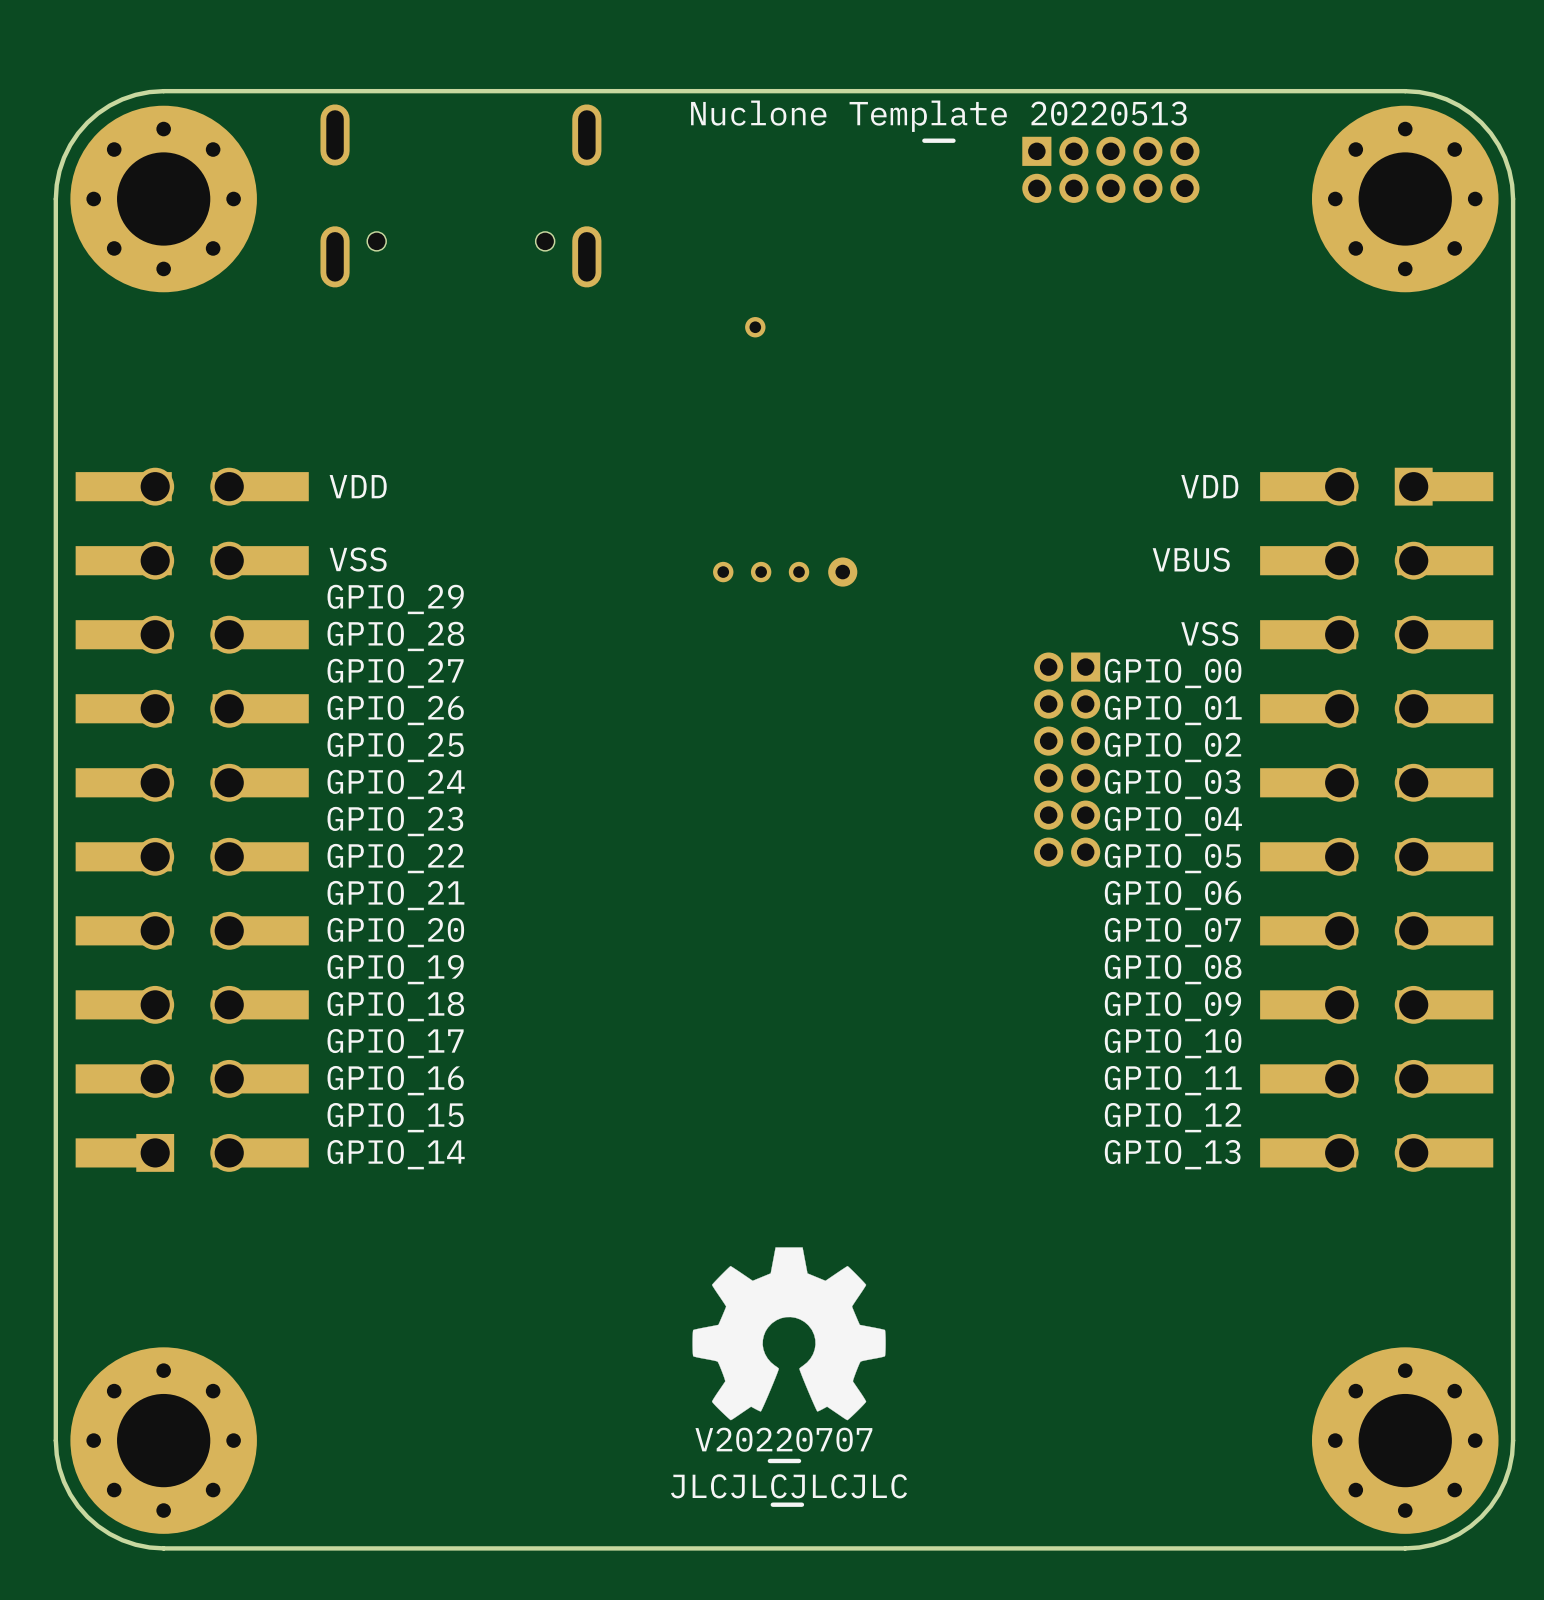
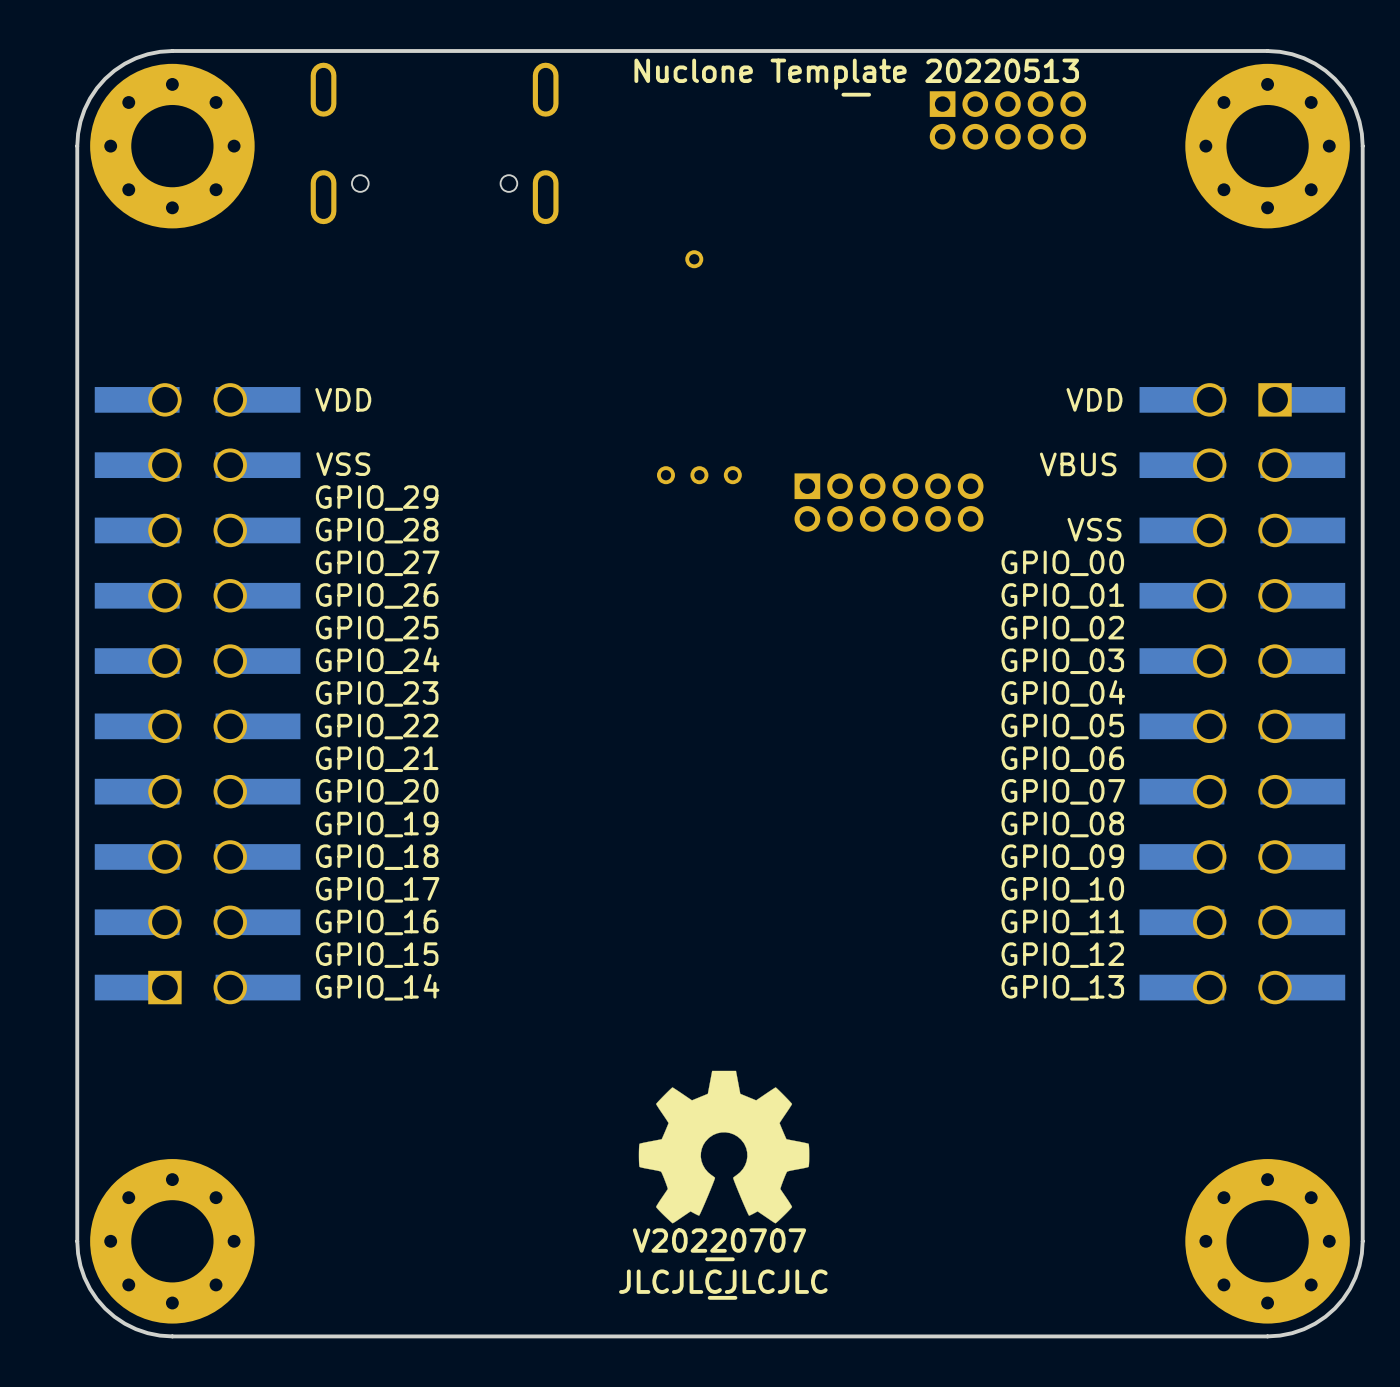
part: (842, 572) -> none
part rotation: 0° (1067, 759) -> 90° counterclockwise (889, 502)
part position: (1067, 759) -> (889, 502)

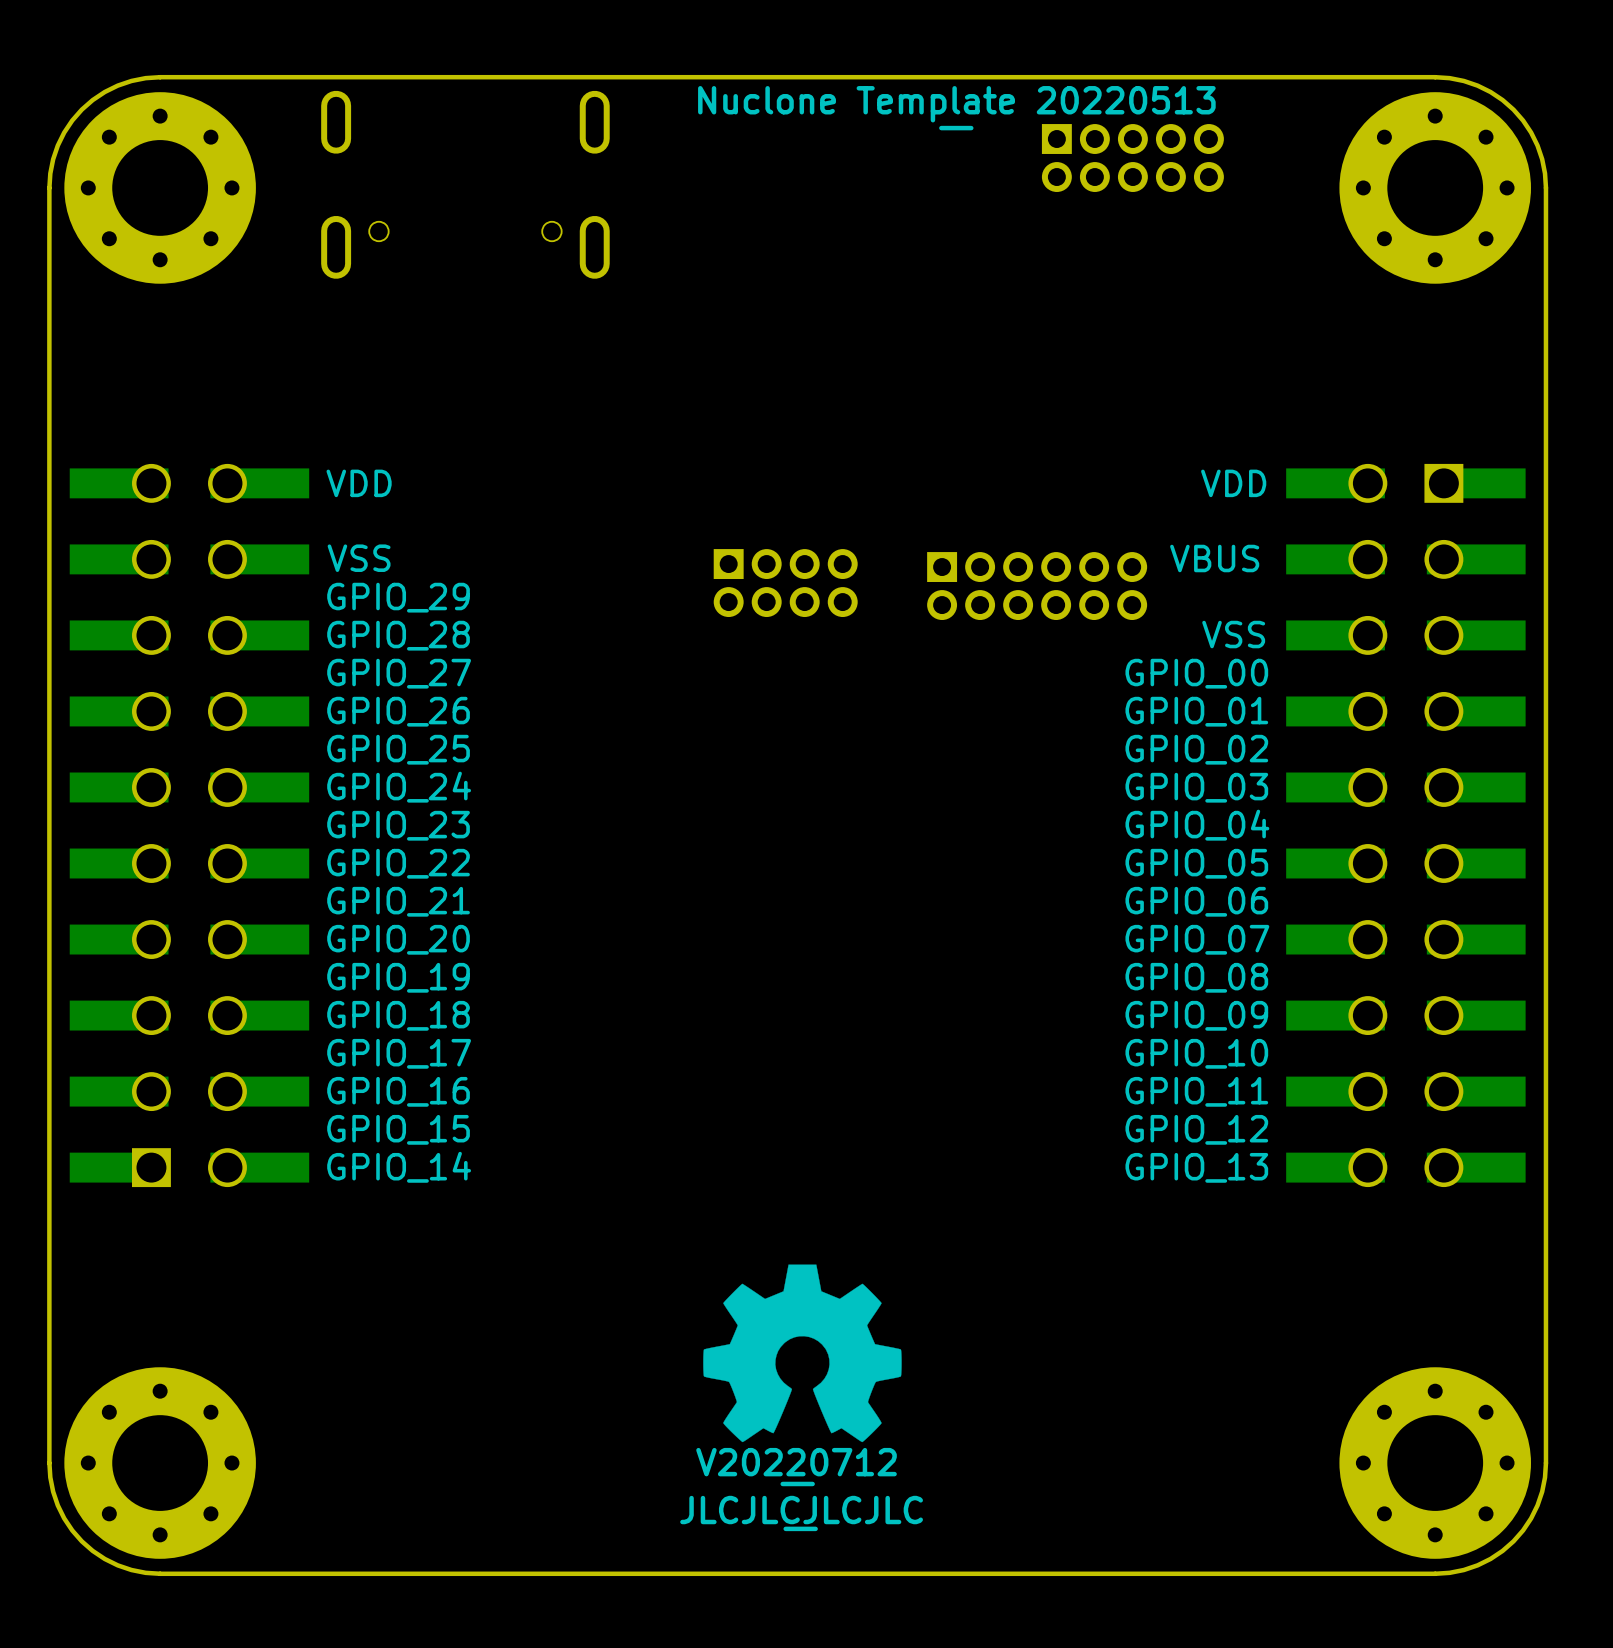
part: (694, 259) -> none
part: (665, 475) -> none
part: (699, 475) -> none
part: (732, 475) -> none
part: none -> (785, 583)
part position: (889, 502) -> (1037, 586)
drawing shape: [632, 1228, 807, 1262] -> [696, 1447, 897, 1487]

